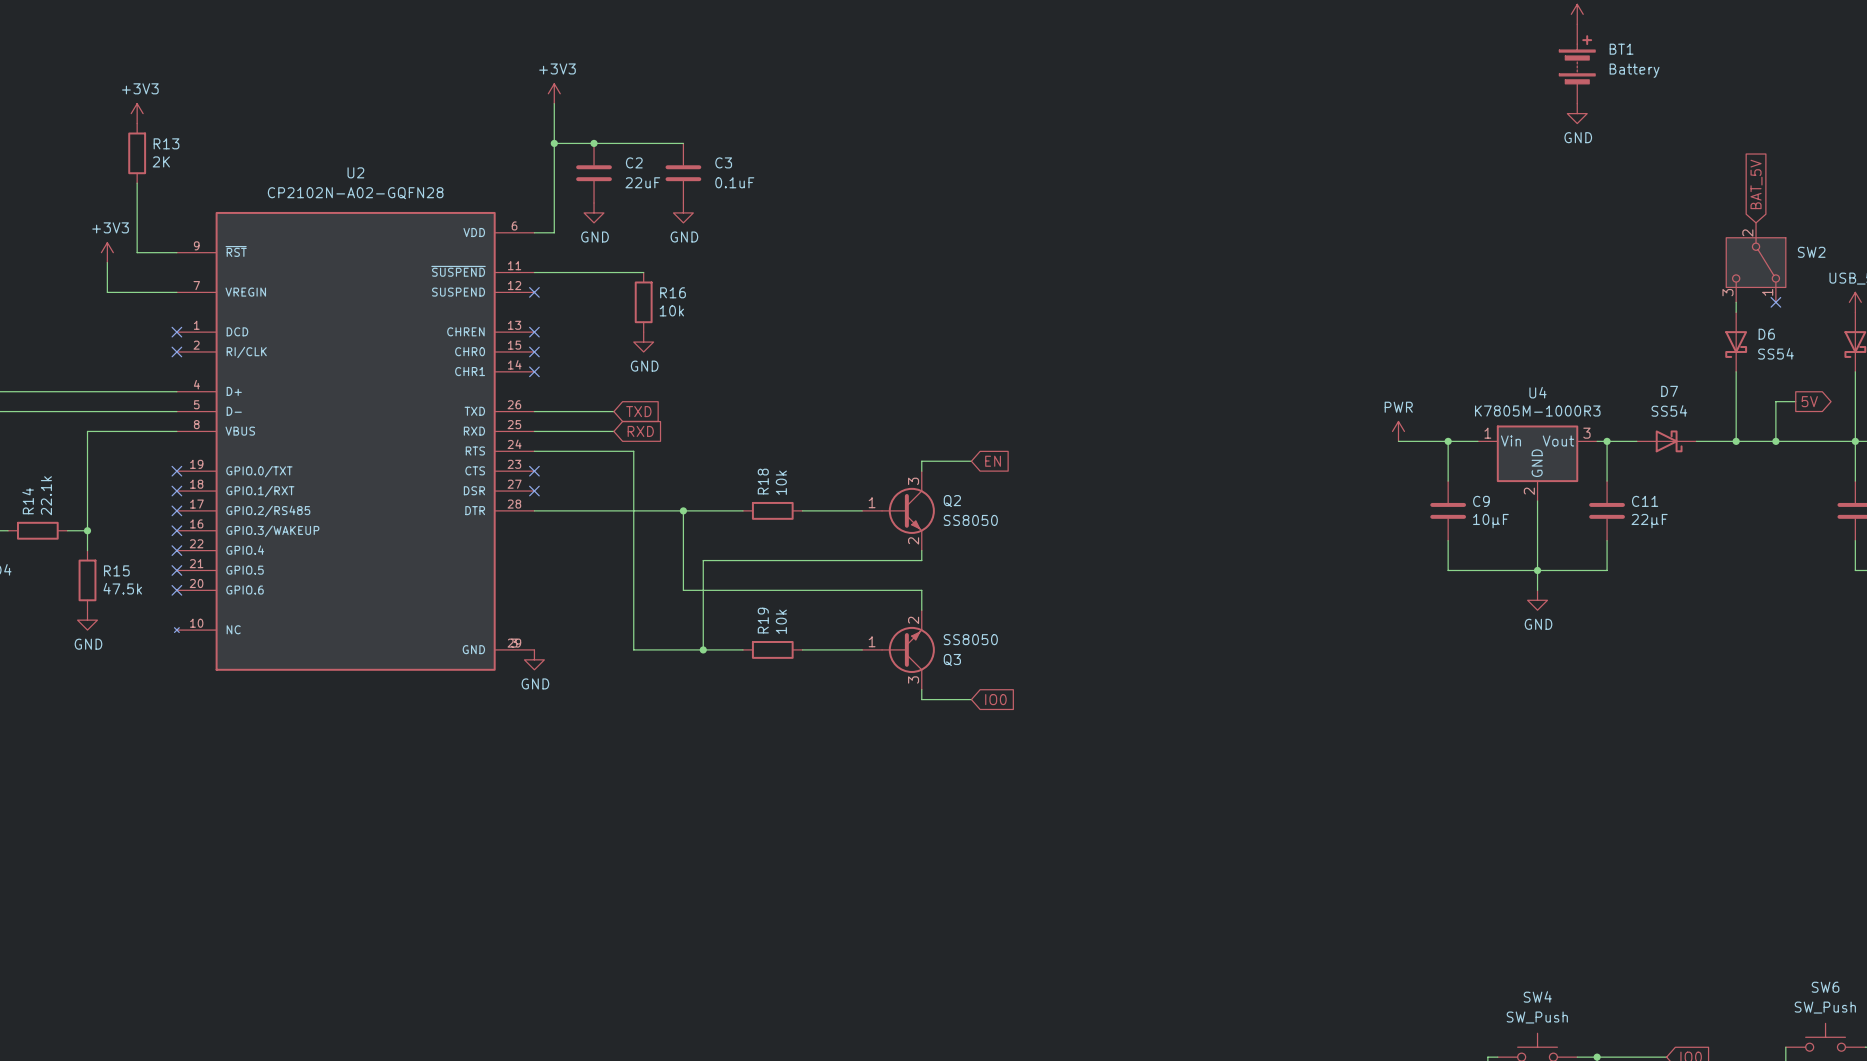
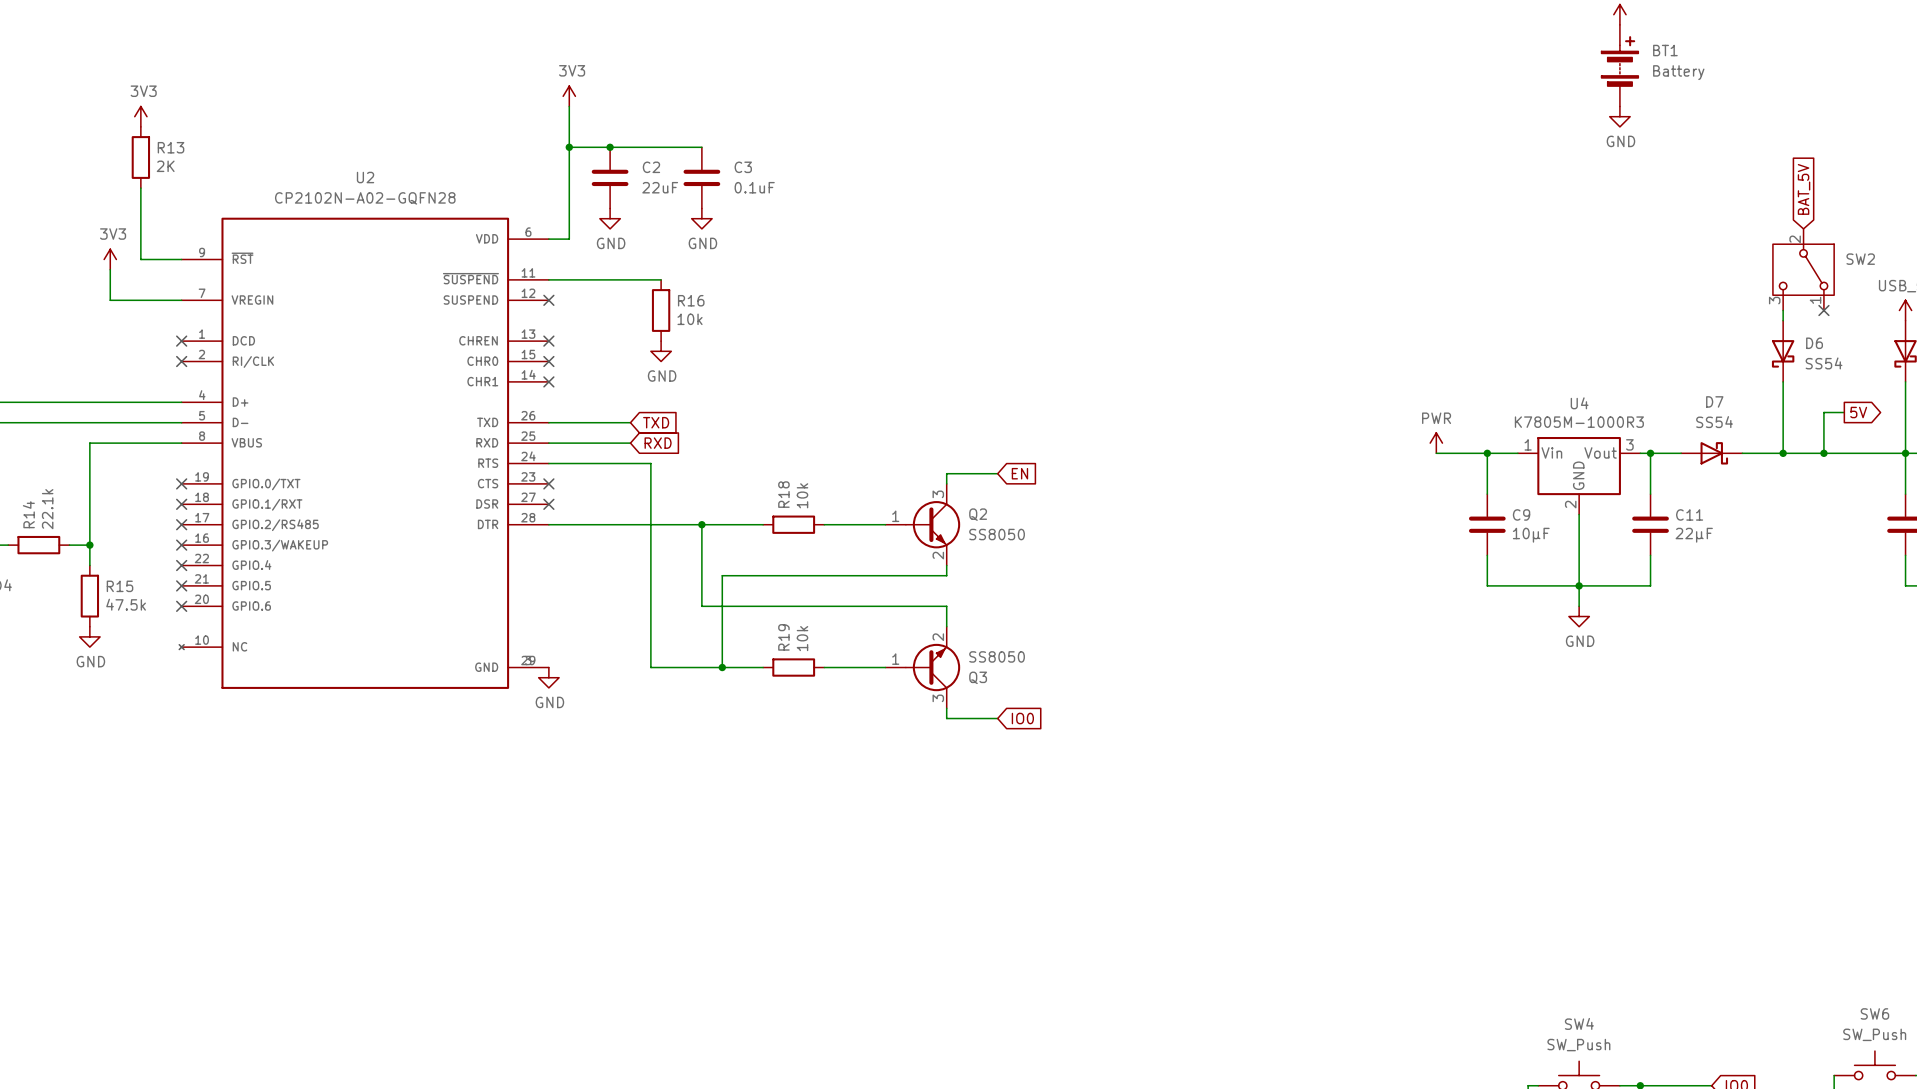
power symbol: +3V3 (554, 93) -> 3V3 (569, 96)
power symbol: +3V3 (137, 113) -> 3V3 (140, 116)
power symbol: +3V3 (107, 252) -> 3V3 (110, 259)

